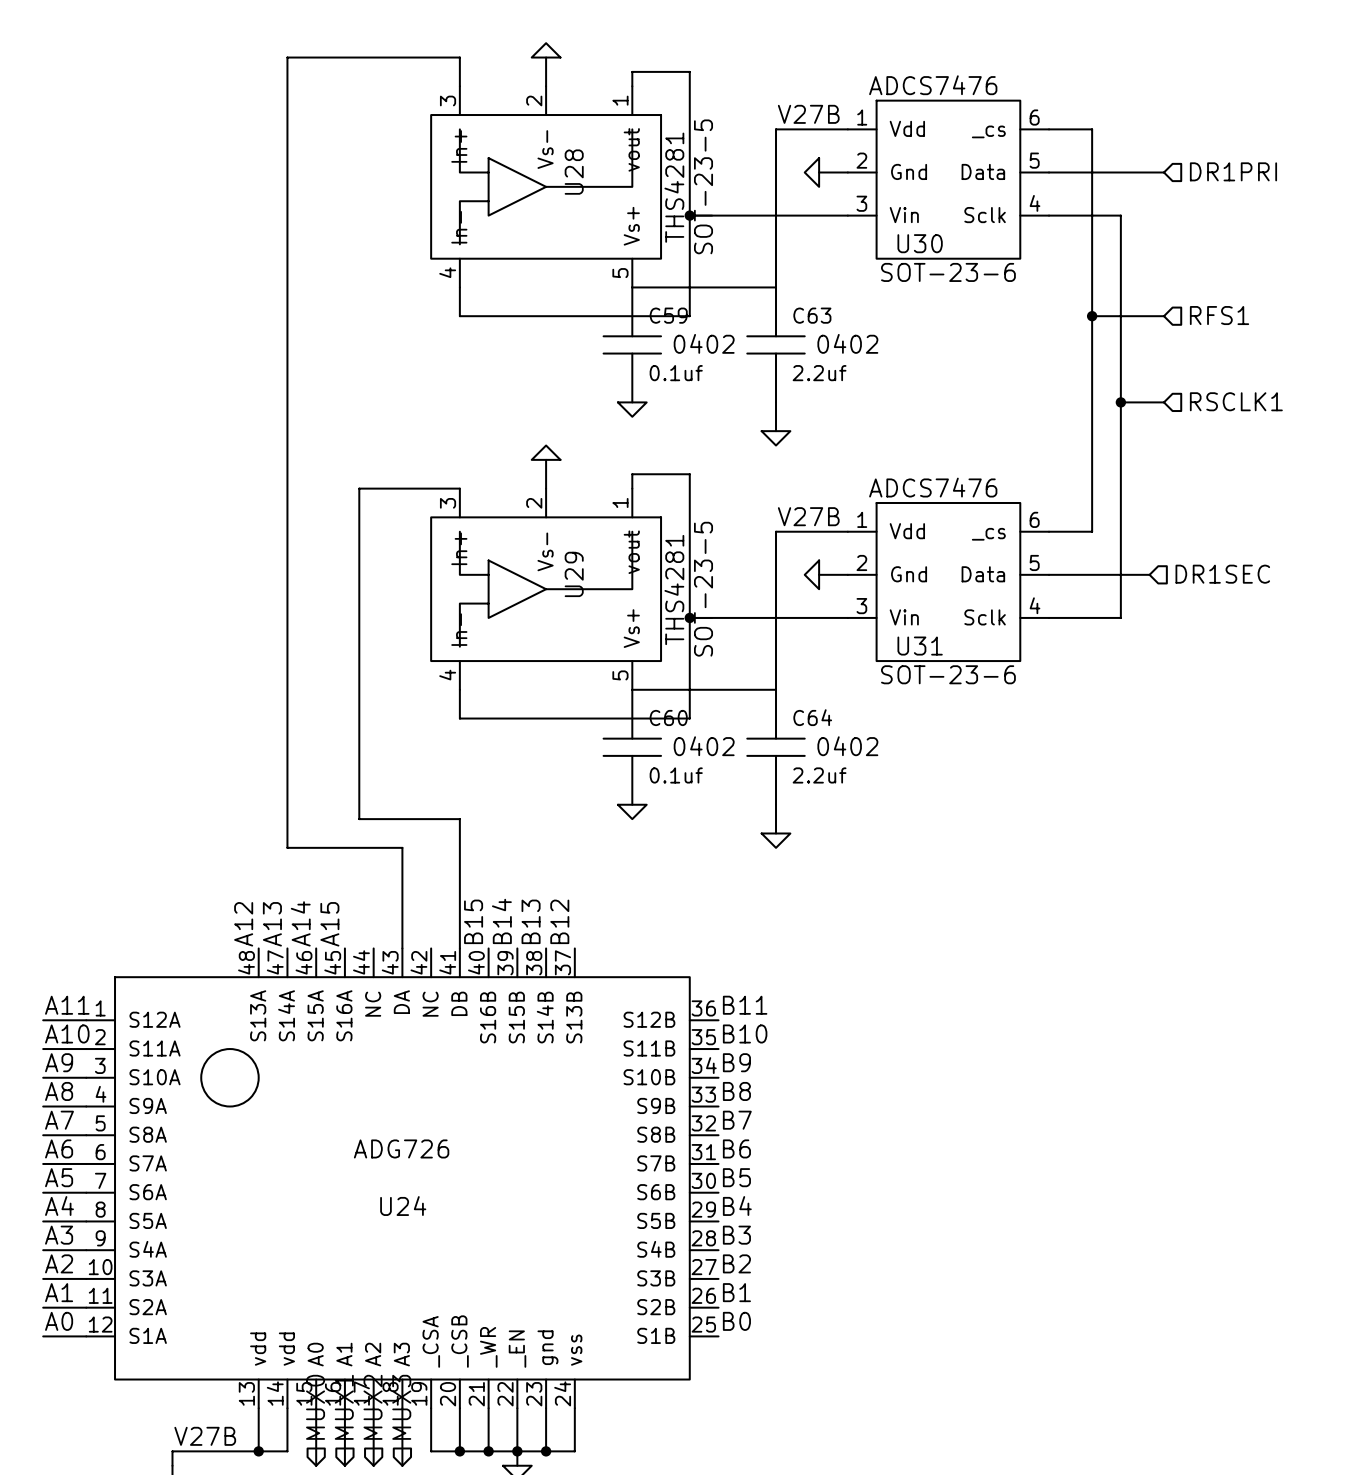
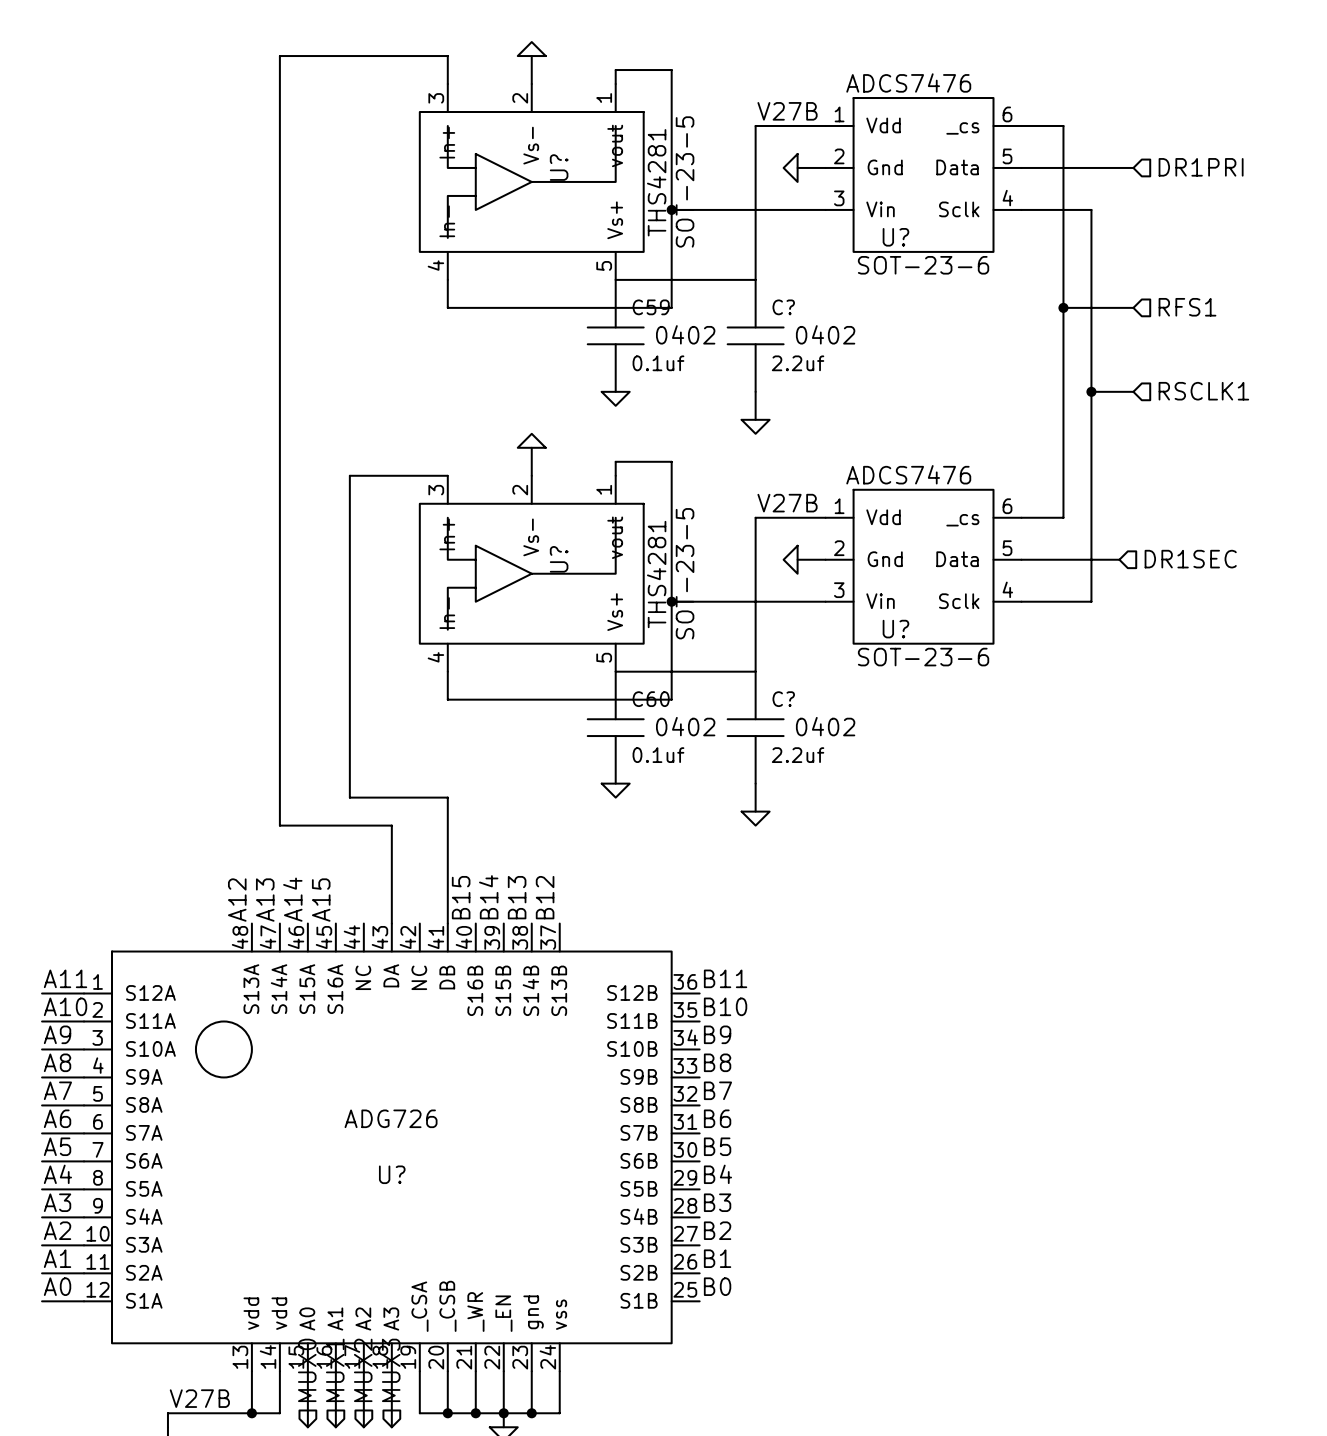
U28 name: U28 (574, 172) -> U? (559, 167)
U30 name: U30 (920, 243) -> U? (895, 237)
C63 name: C63 (812, 315) -> C? (783, 307)
U29 name: U29 (574, 574) -> U? (559, 559)
U31 name: U31 (920, 646) -> U? (895, 629)
C64 name: C64 (812, 717) -> C? (783, 699)
U24 name: U24 (403, 1206) -> U? (392, 1174)

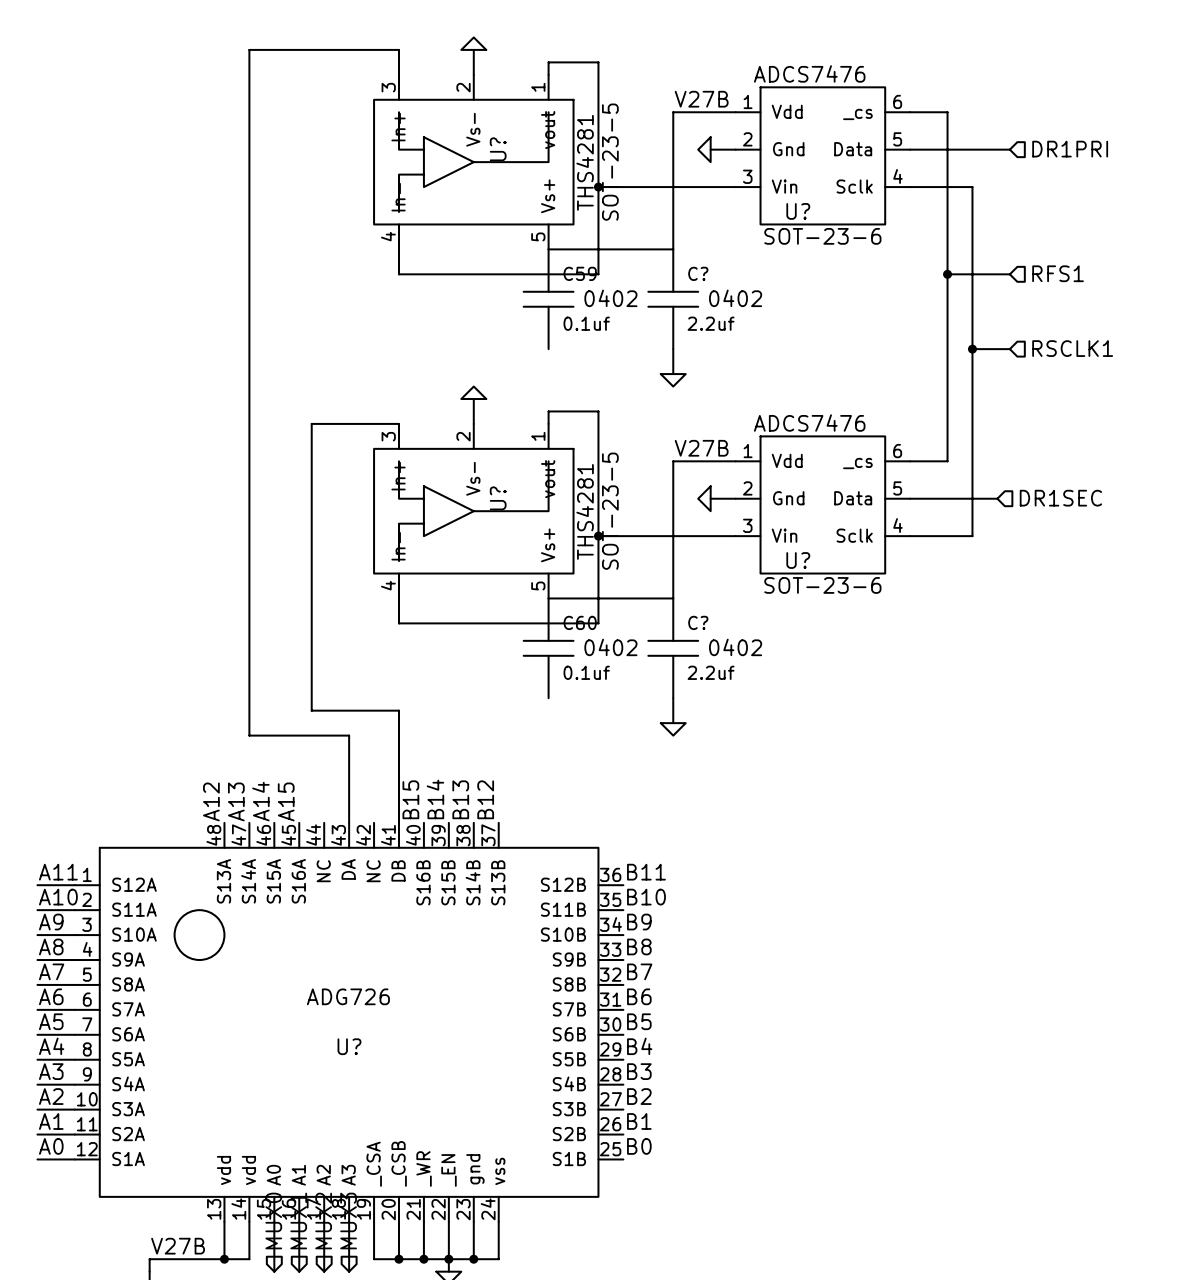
power symbol: (615, 398) -> none
power symbol: (615, 790) -> none

